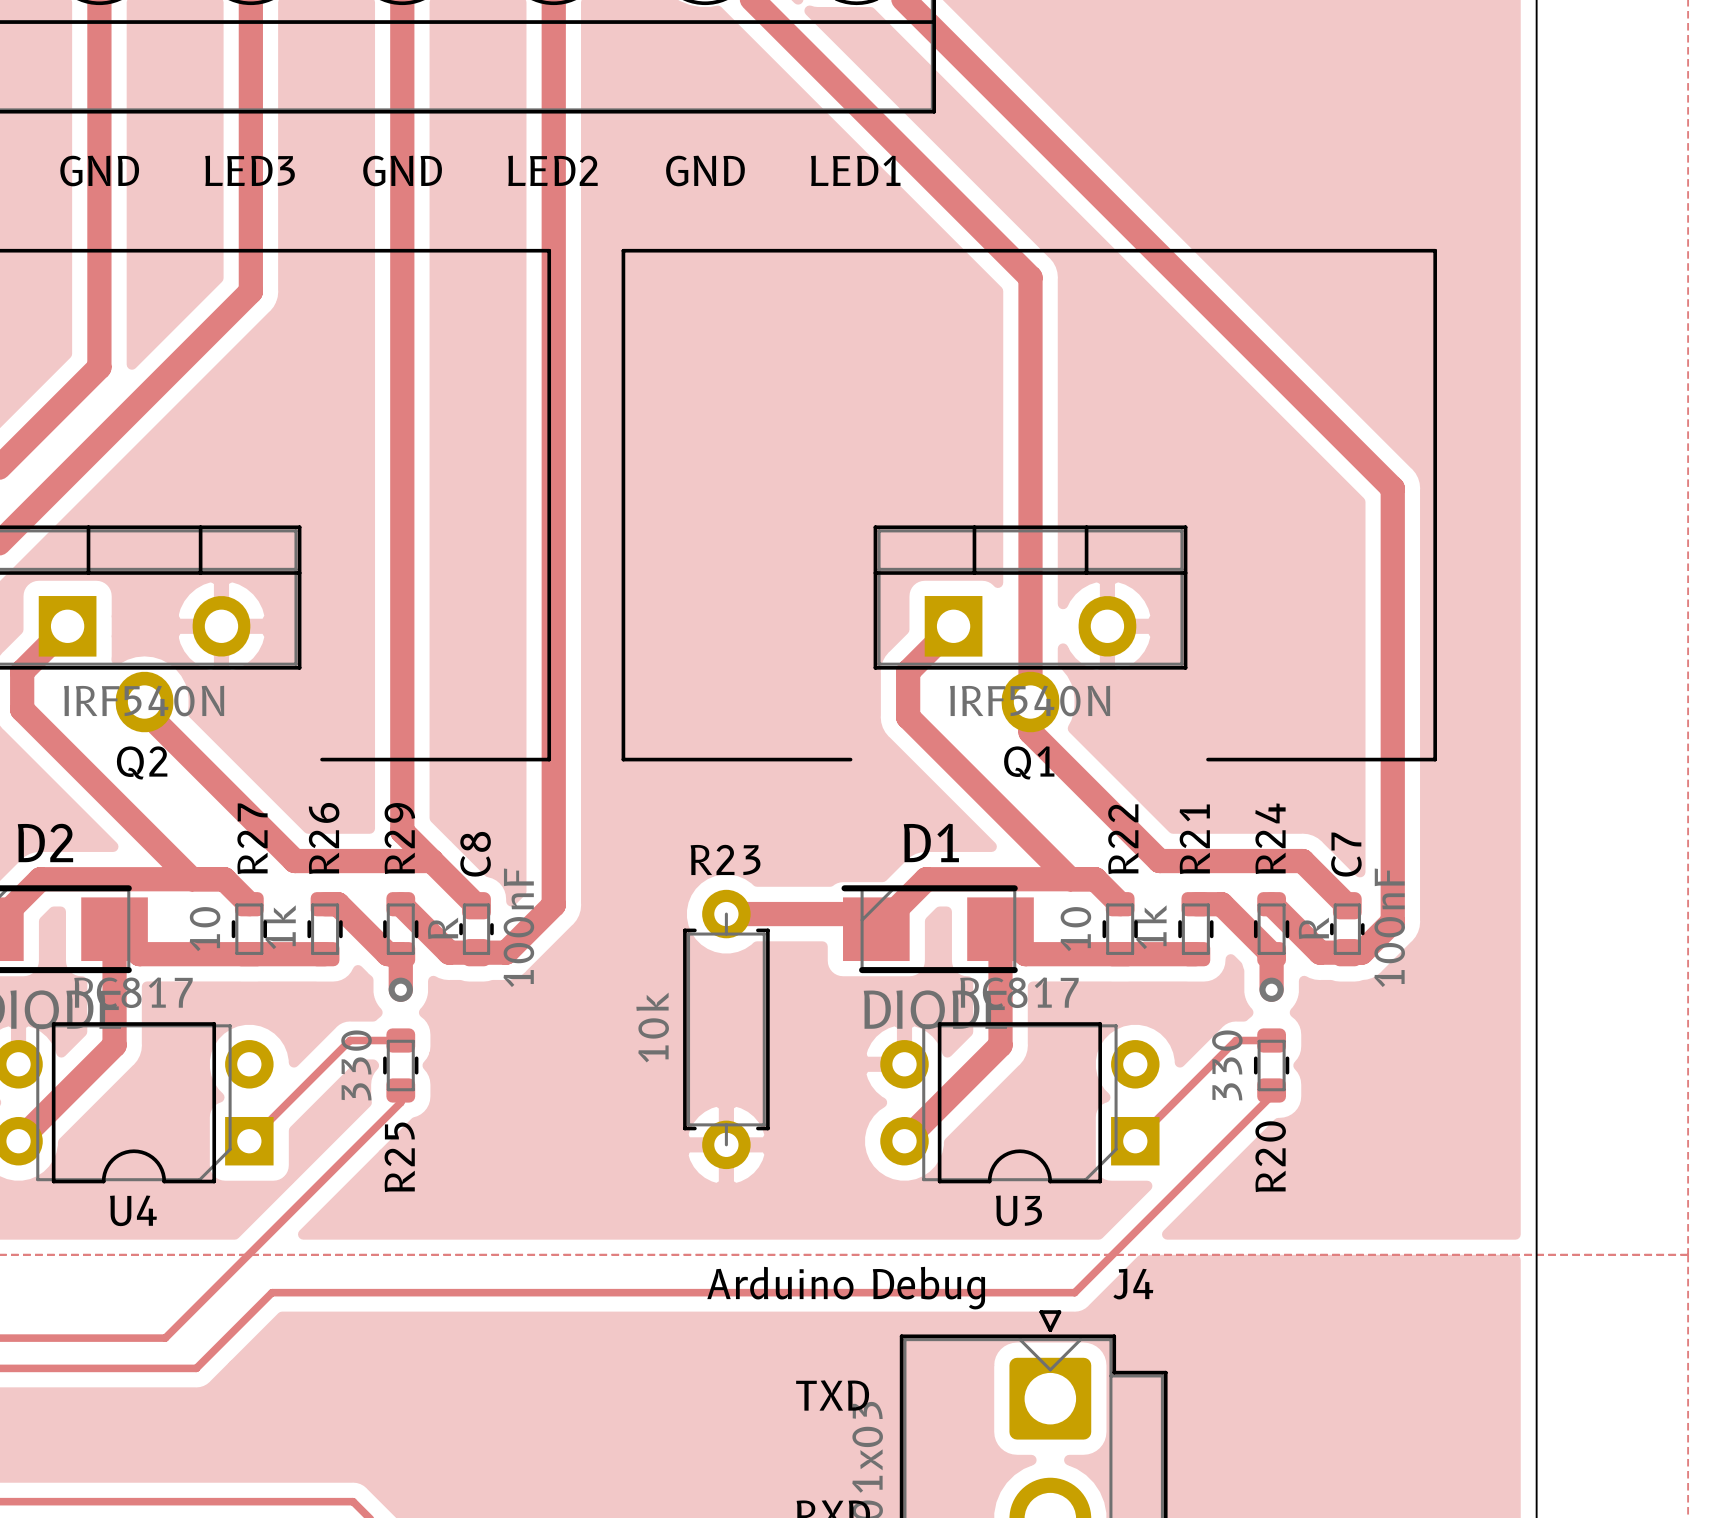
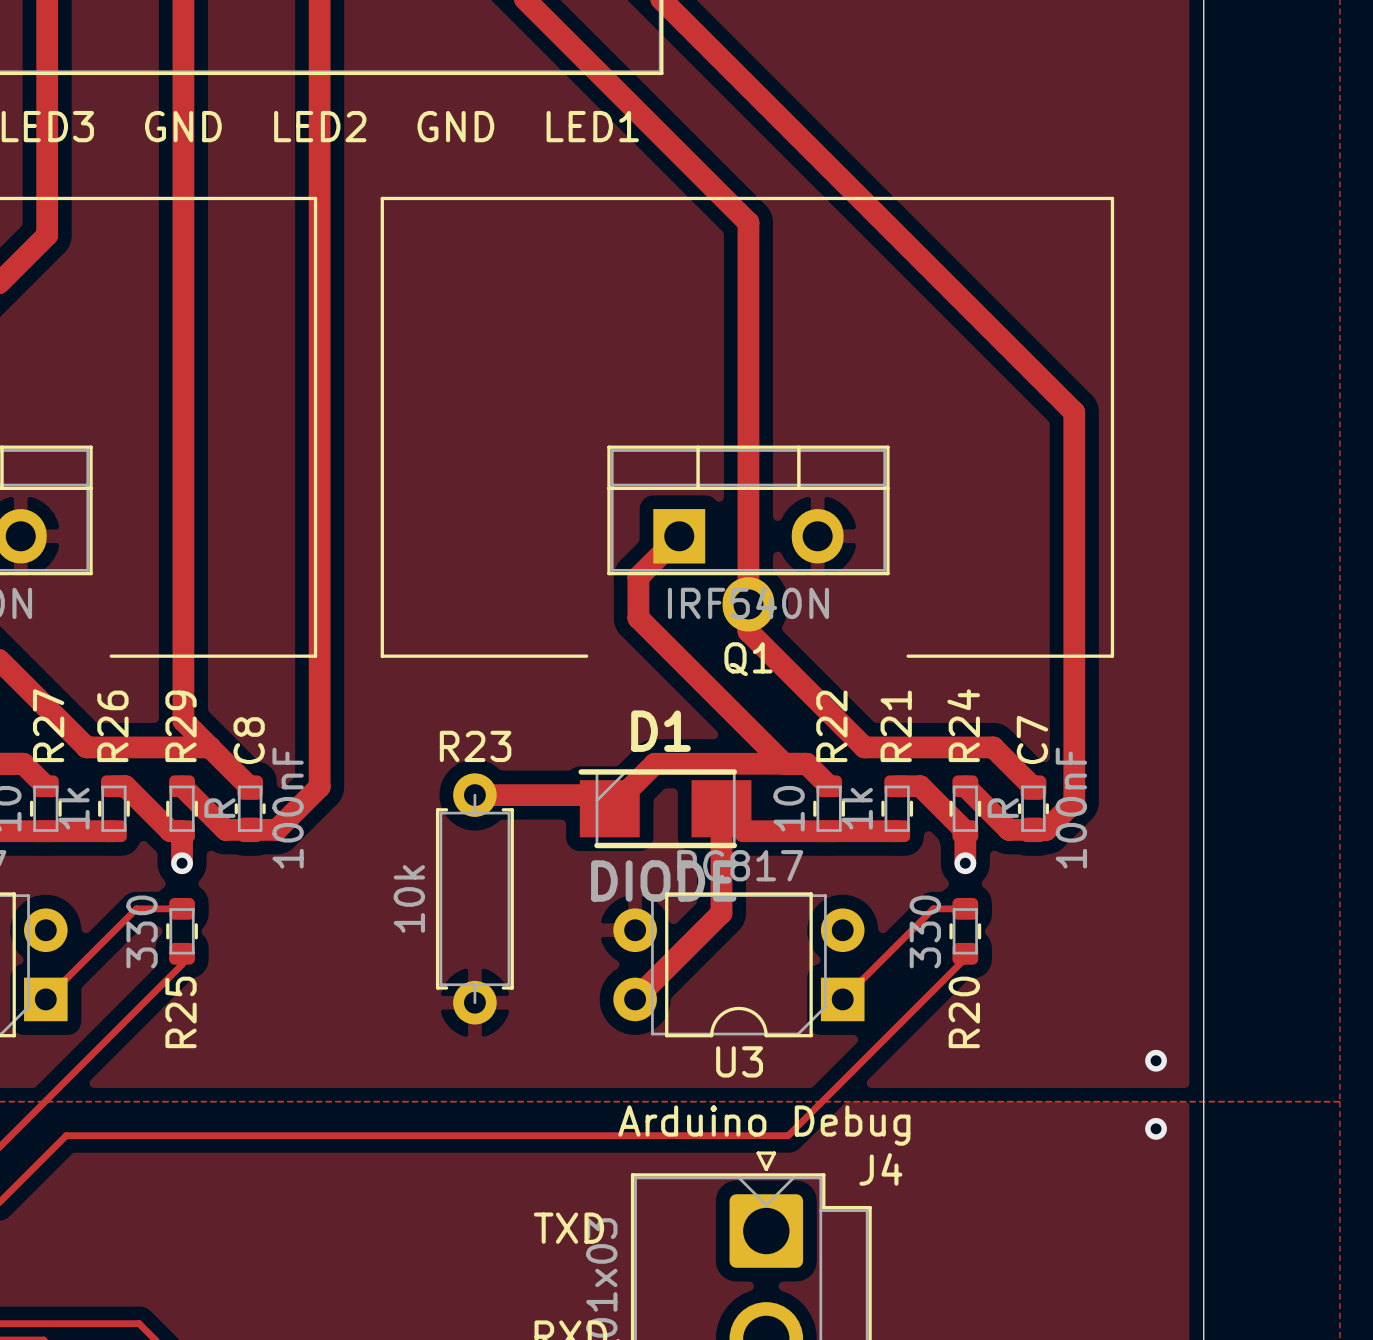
via: none -> (1156, 1060)
J4 name position: J4 (1133, 1284) -> J4 (880, 1169)
via: none -> (1156, 1128)
text position: Arduino Debug (846, 1288) -> Arduino Debug (764, 1125)

